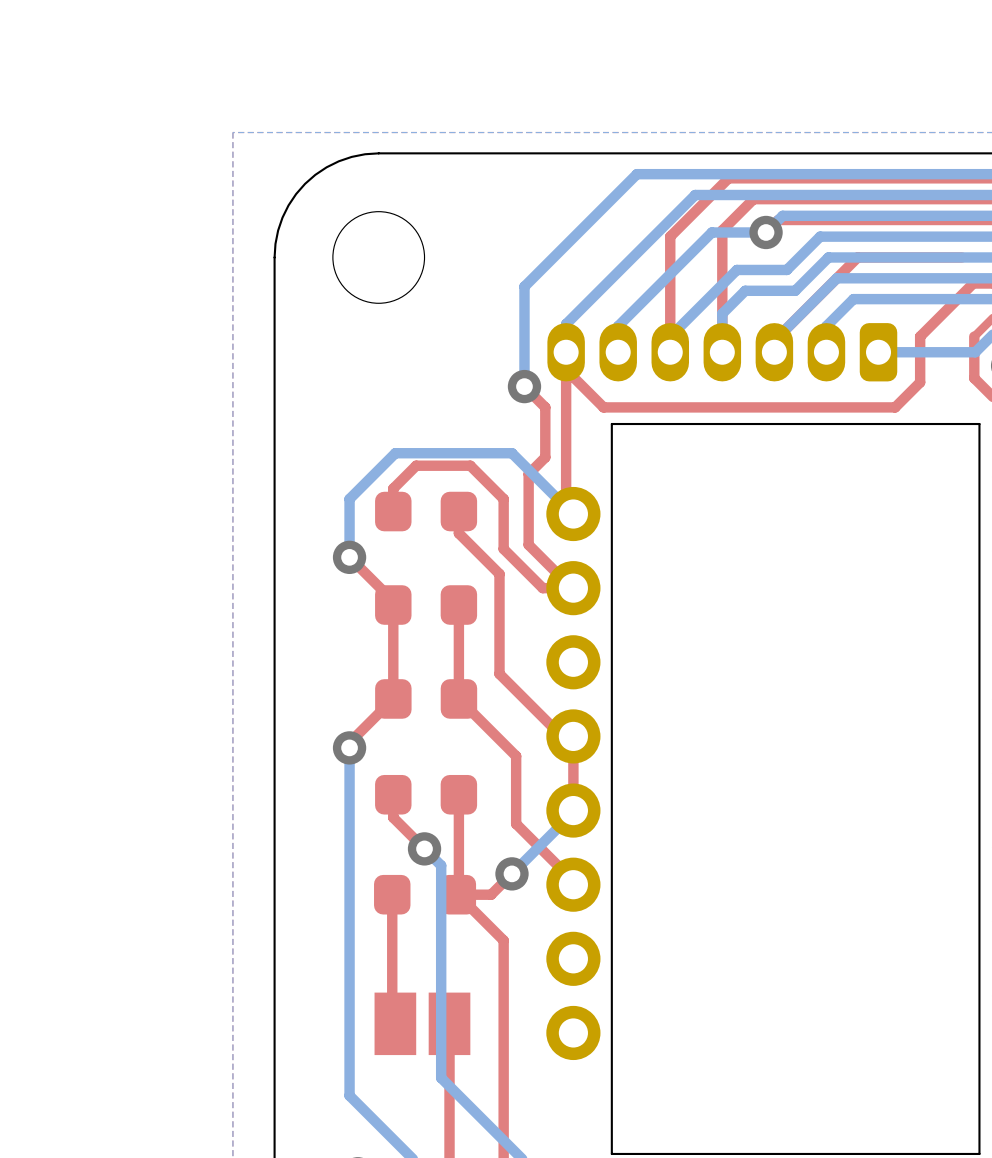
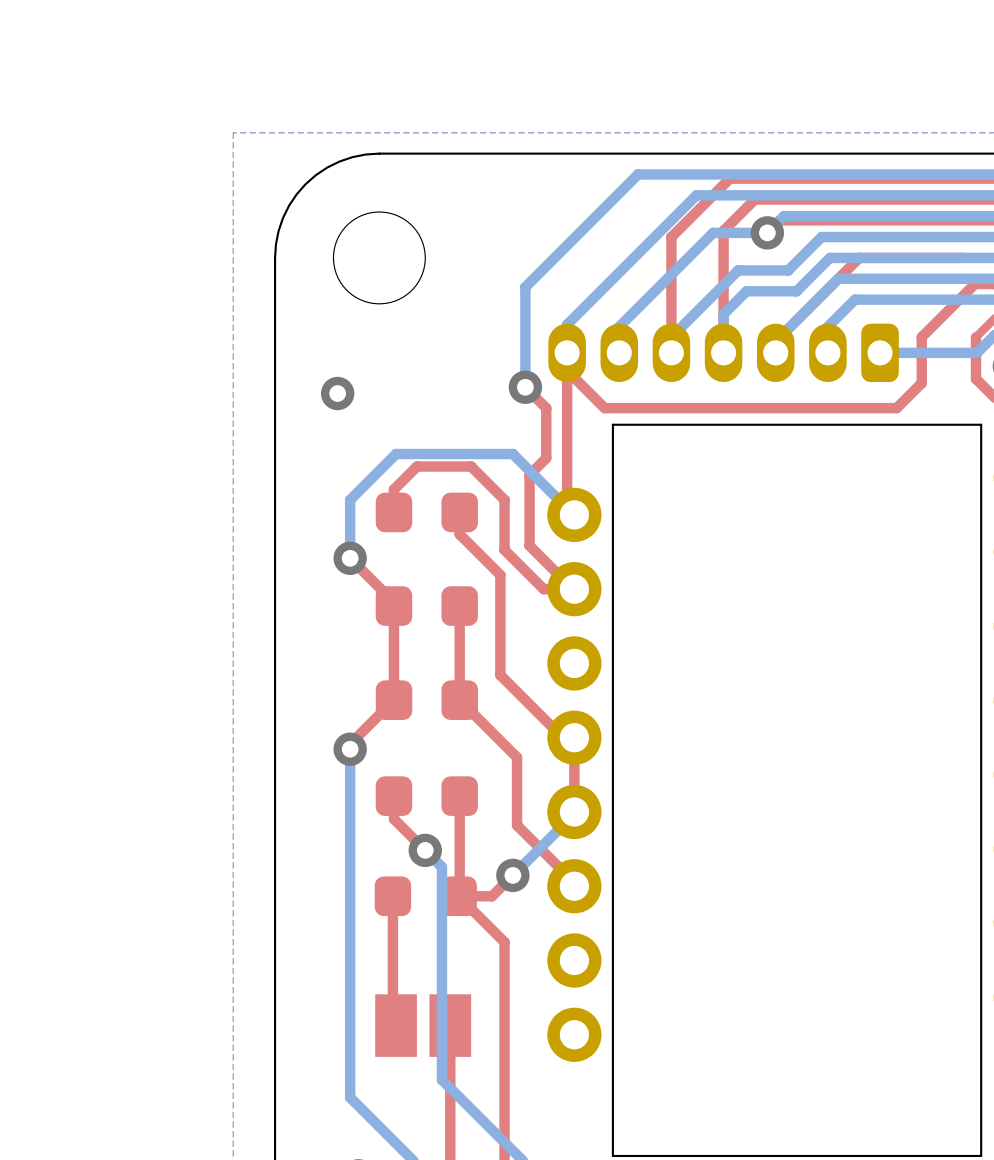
via: none -> (337, 393)

